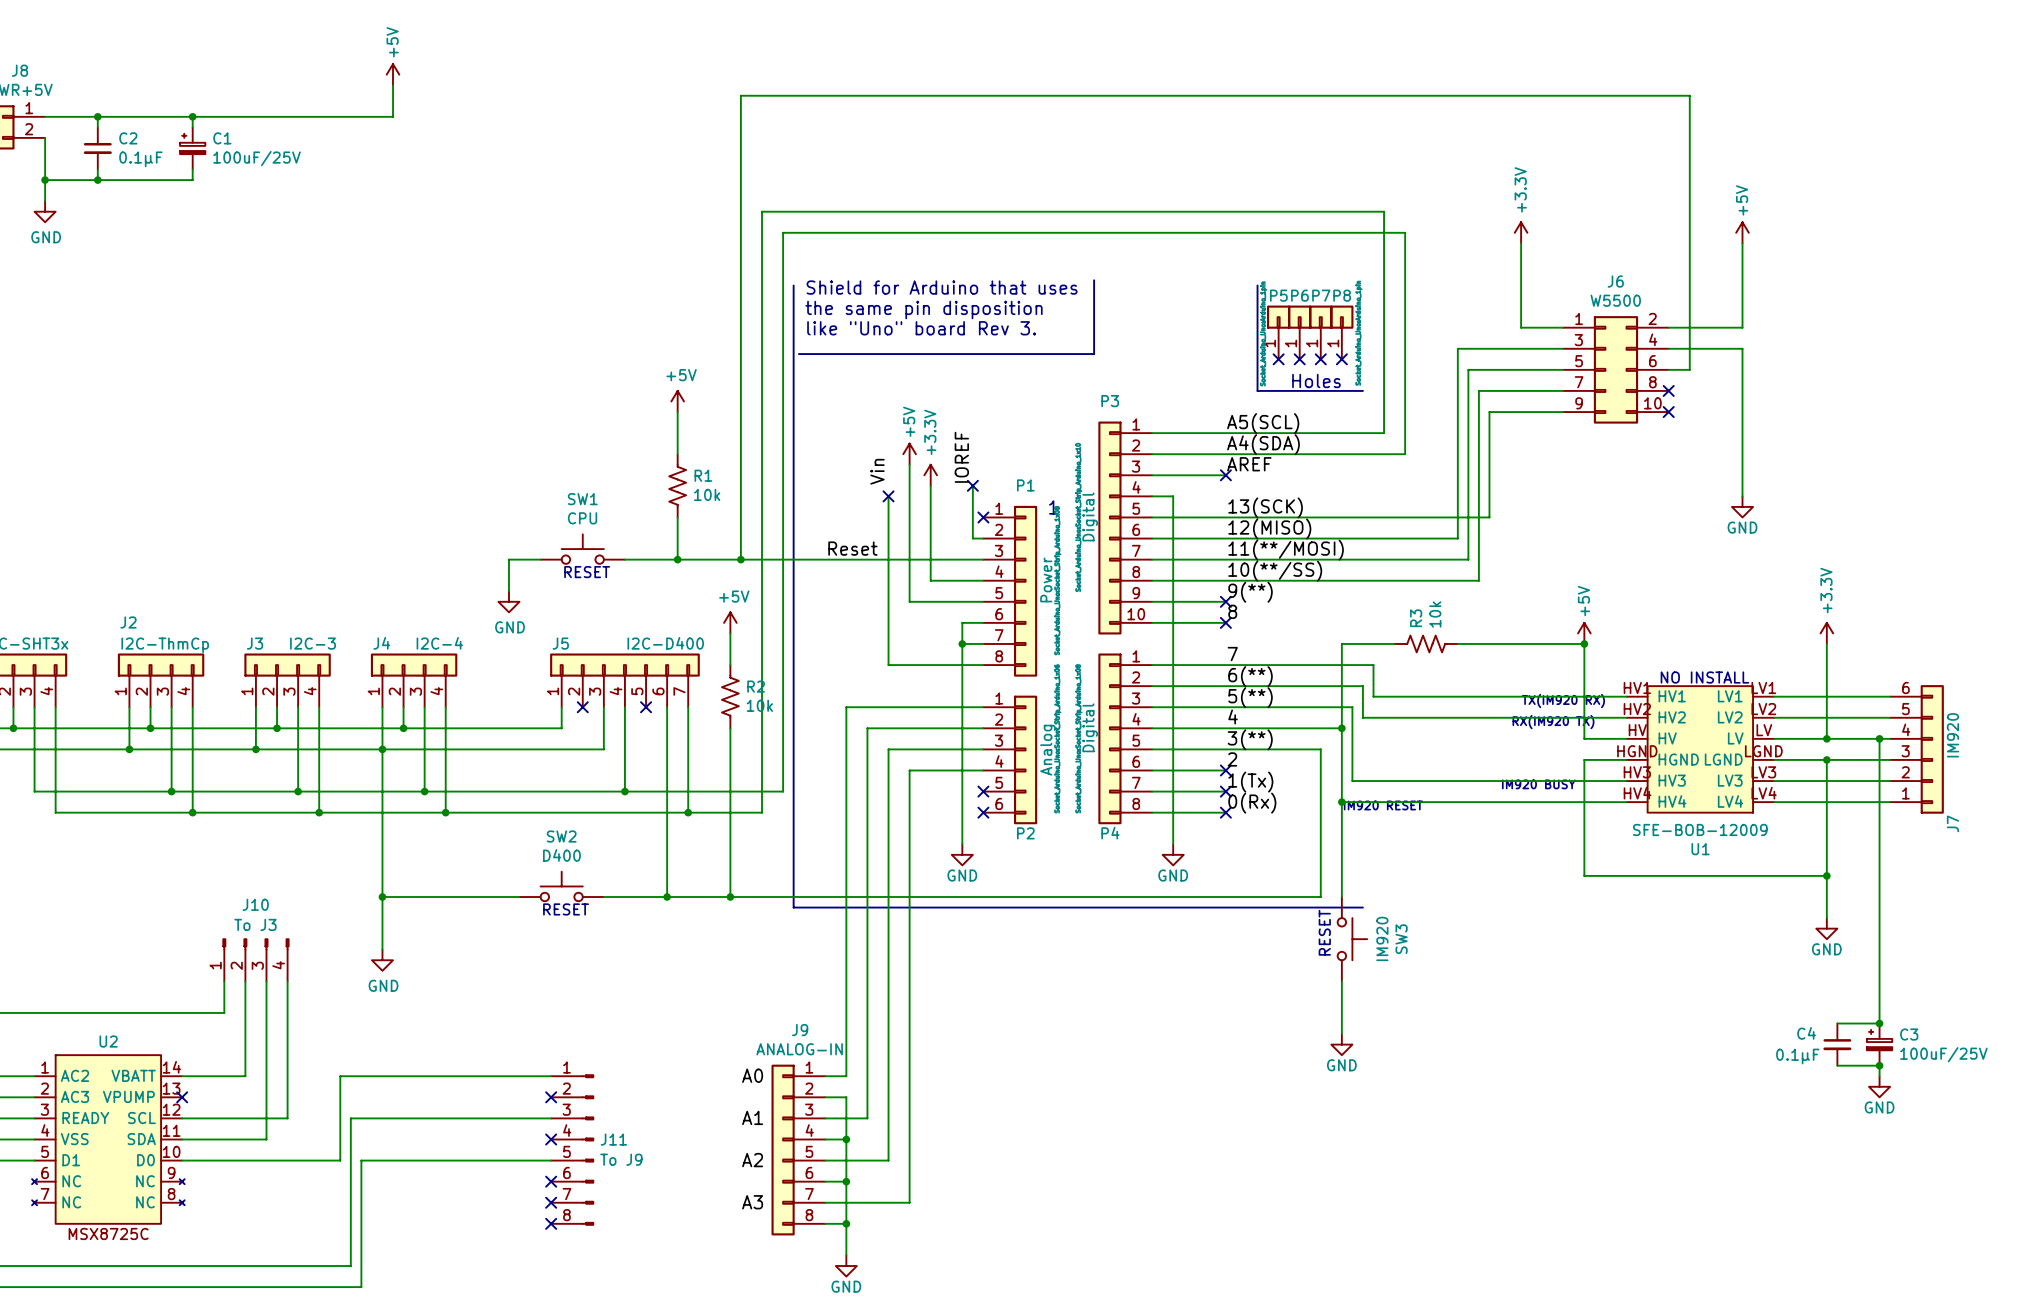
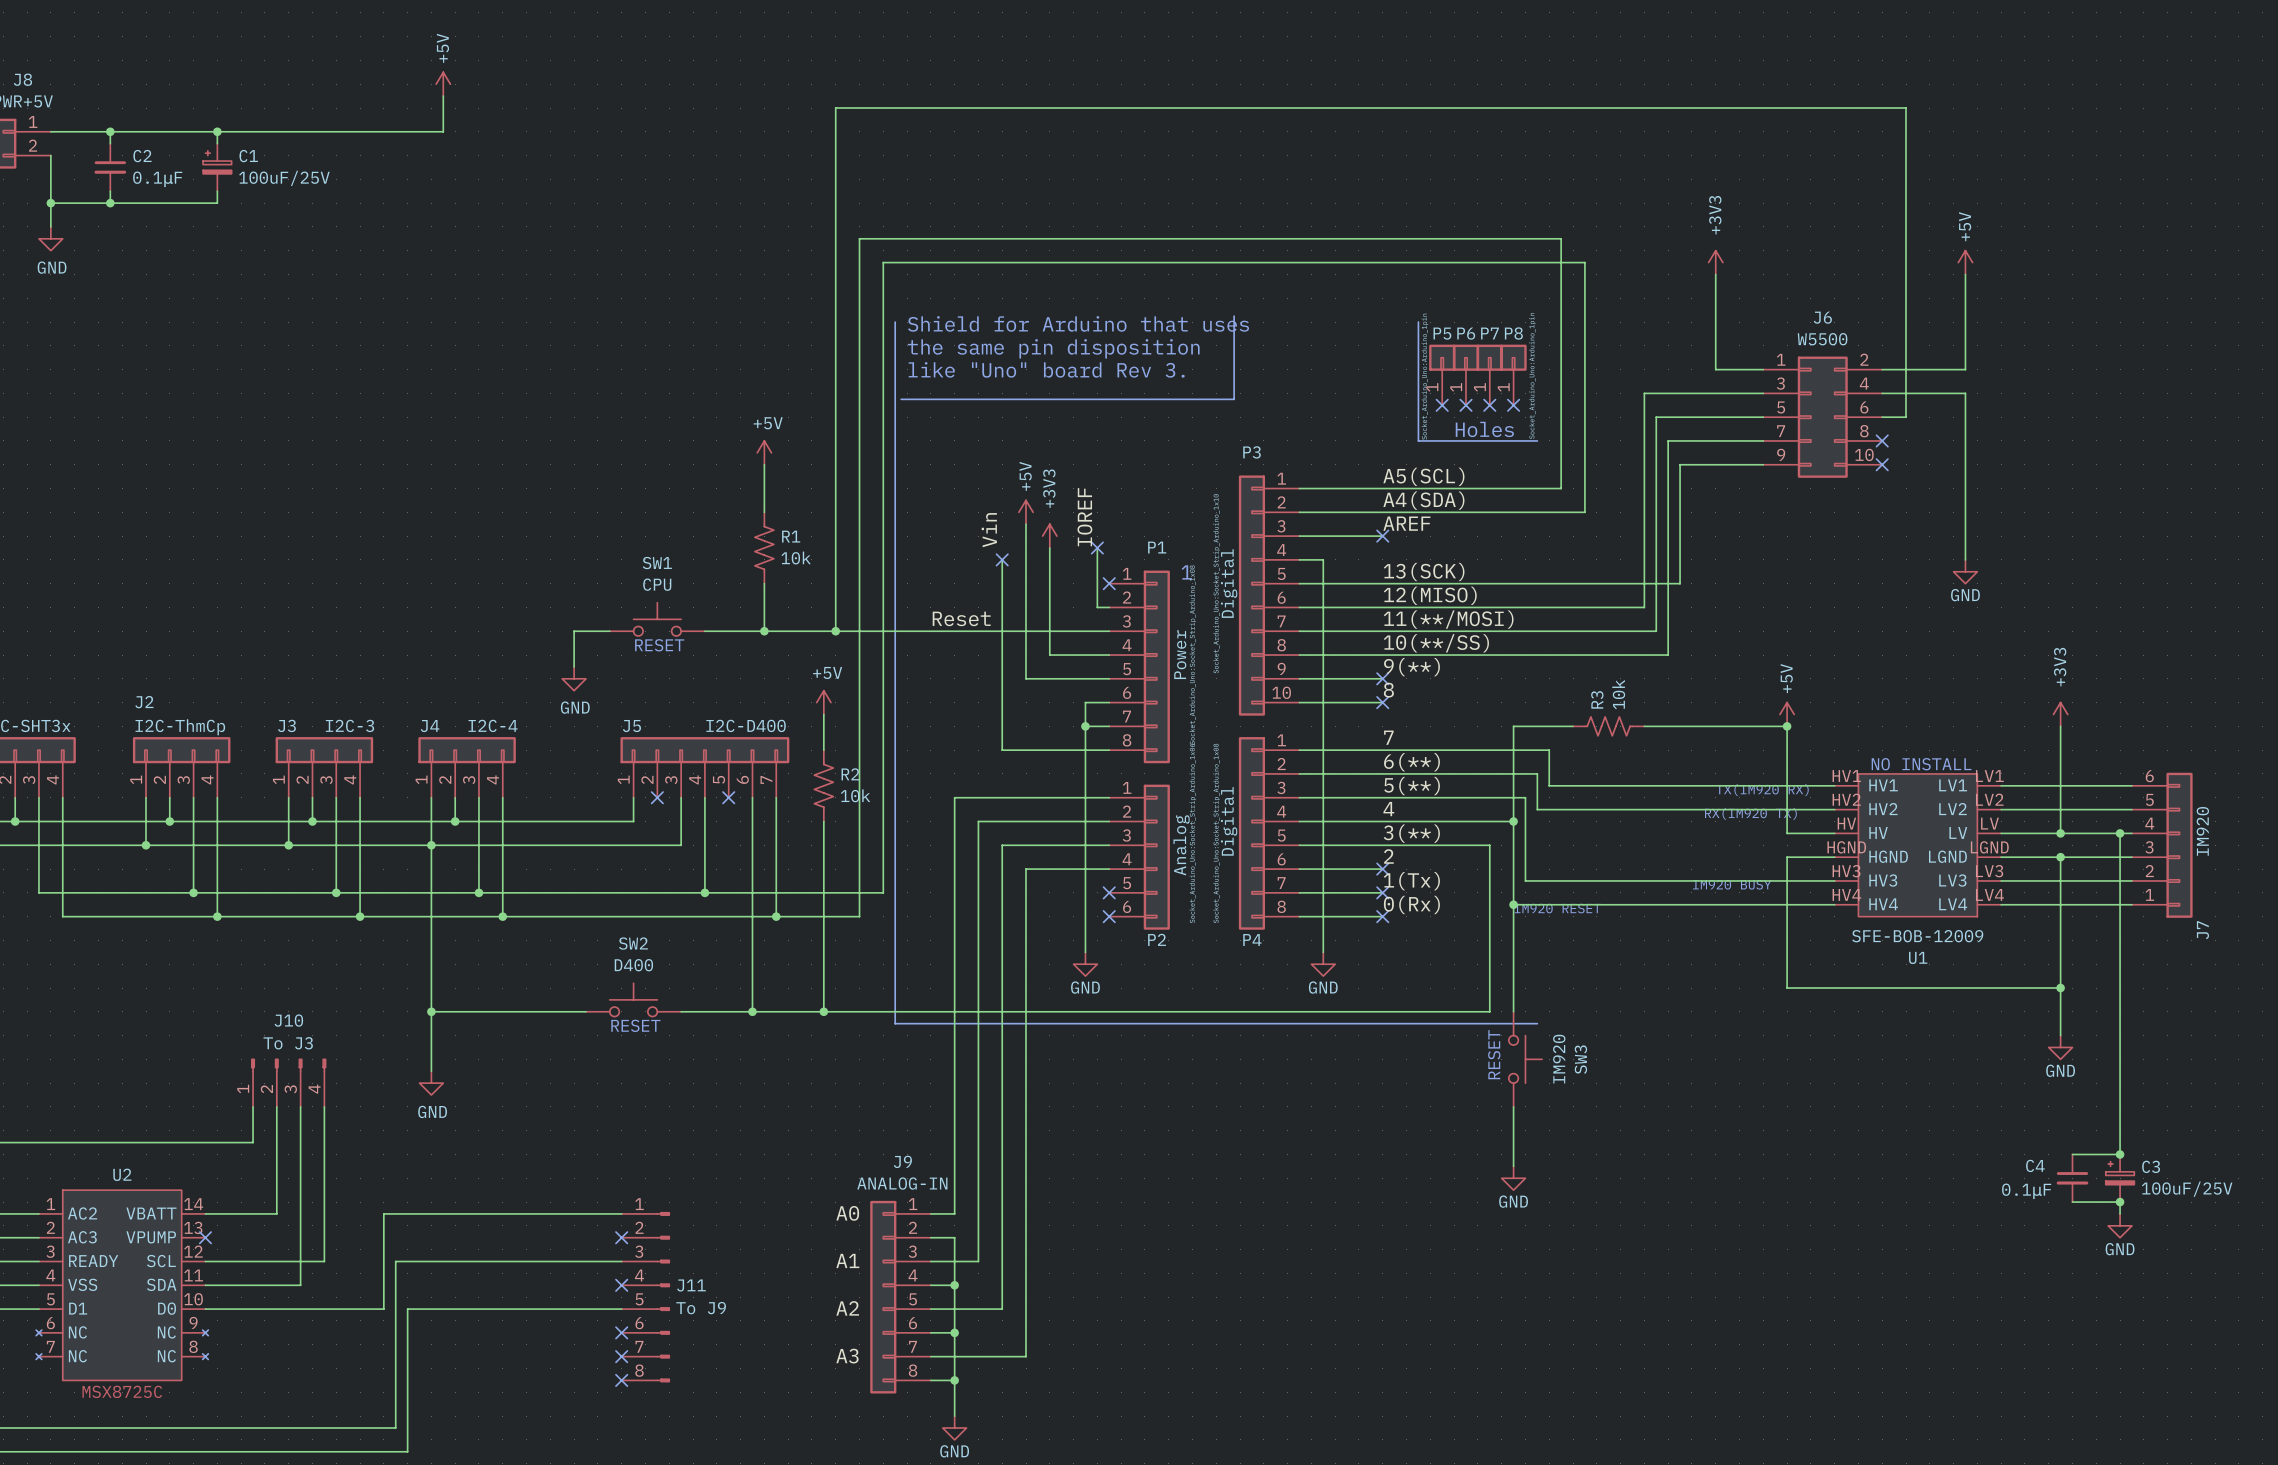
power symbol: +3.3V (1521, 232) -> +3V3 (1715, 262)
power symbol: +3.3V (930, 475) -> +3V3 (1049, 536)
power symbol: +3.3V (1826, 633) -> +3V3 (2060, 714)

